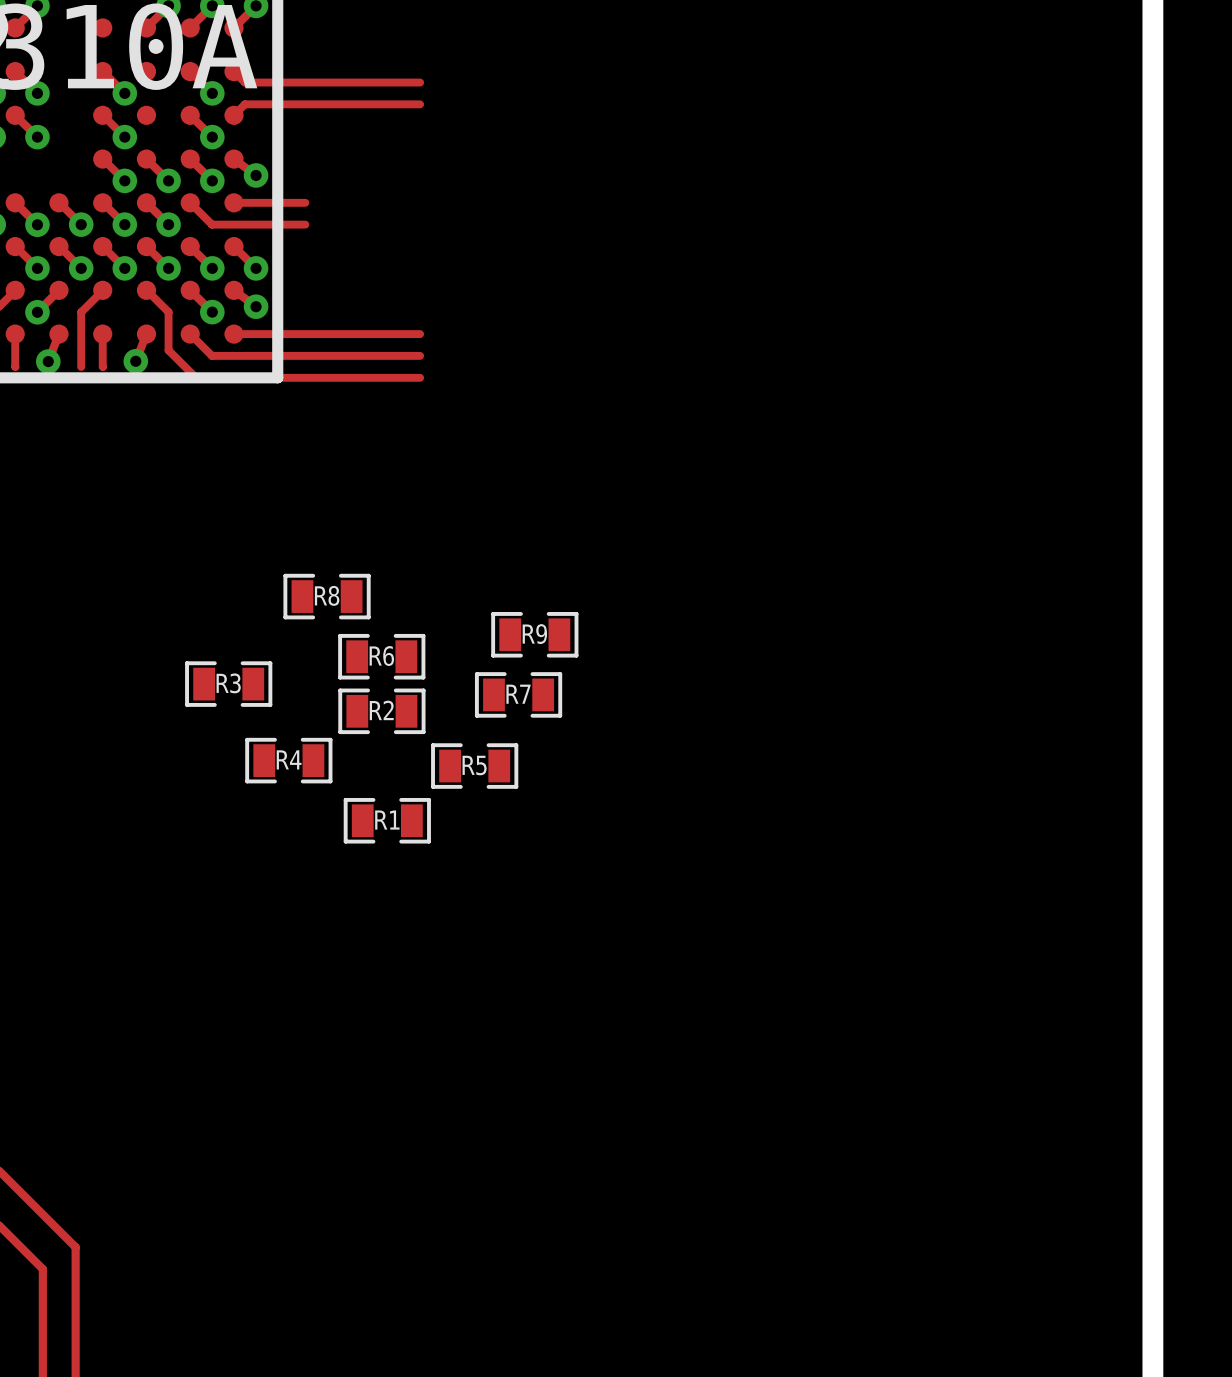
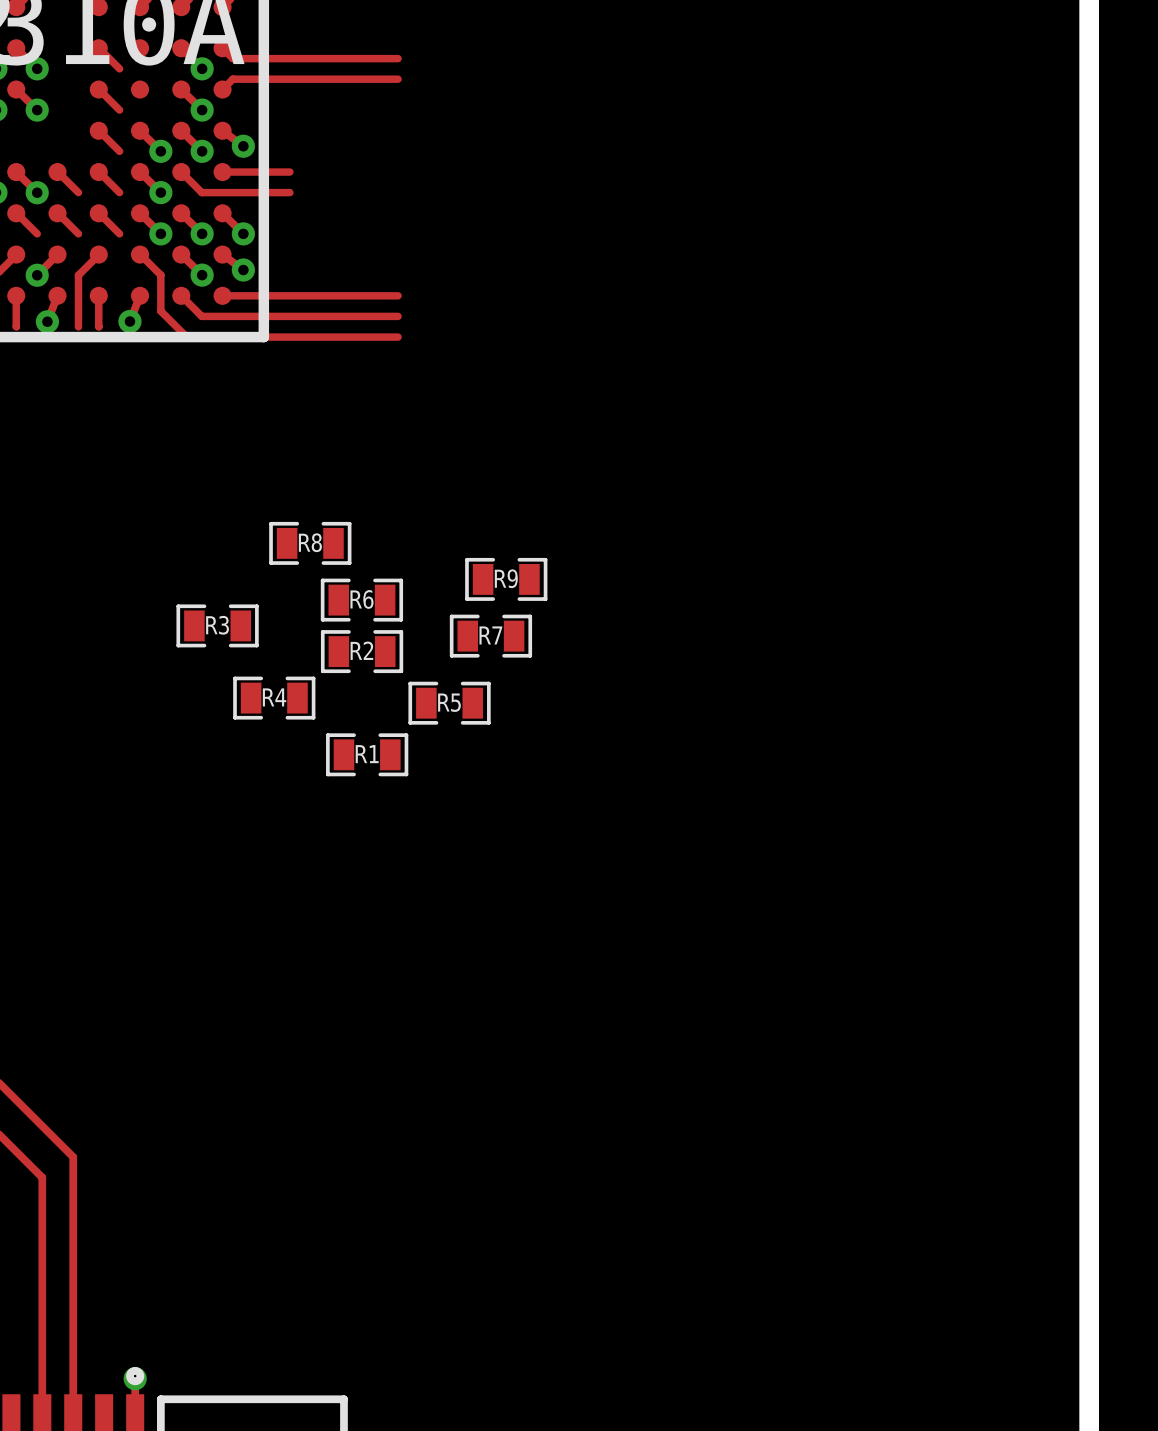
via: (124, 93) -> none
via: (124, 137) -> none
via: (124, 180) -> none
via: (81, 224) -> none
via: (124, 224) -> none
via: (37, 268) -> none
via: (81, 268) -> none
via: (124, 268) -> none

